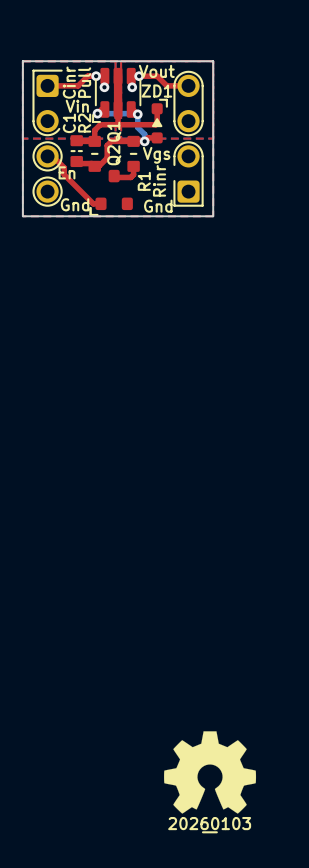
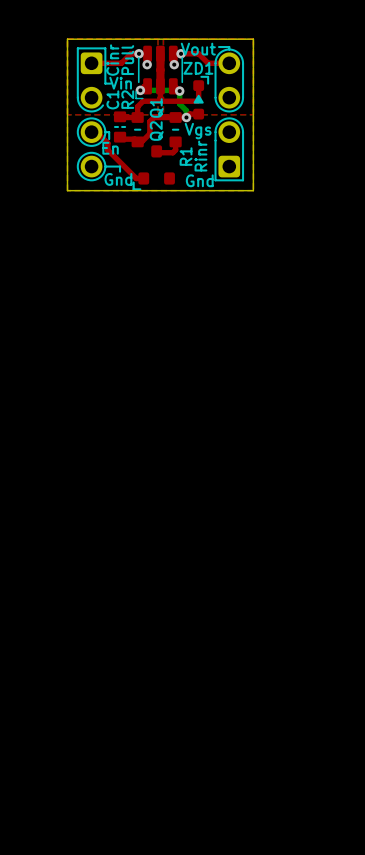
line: none -> (218, 47) (229, 47) (229, 49)
line: none -> (105, 48) (105, 83) (110, 83)
line: none -> (105, 132) (109, 132) (109, 139)
line: none -> (215, 140) (215, 156)
line: none -> (105, 166) (120, 166) (120, 171)
drawing: [164, 731, 257, 834] -> none

